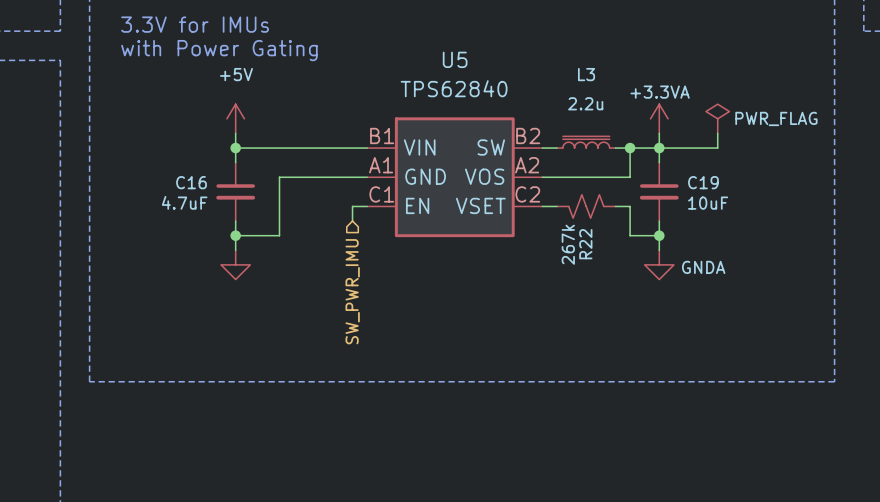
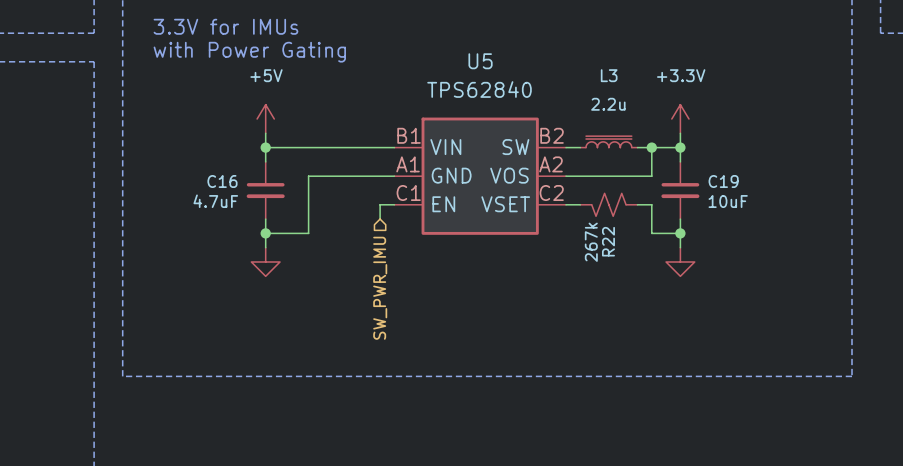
power symbol: +3.3VA (659, 118) -> +3.3V (680, 119)
power symbol: PWR_FLAG (717, 118) -> none
wire: (717, 133) (717, 148) (659, 148) -> none
power symbol text: GNDA (703, 267) -> none

